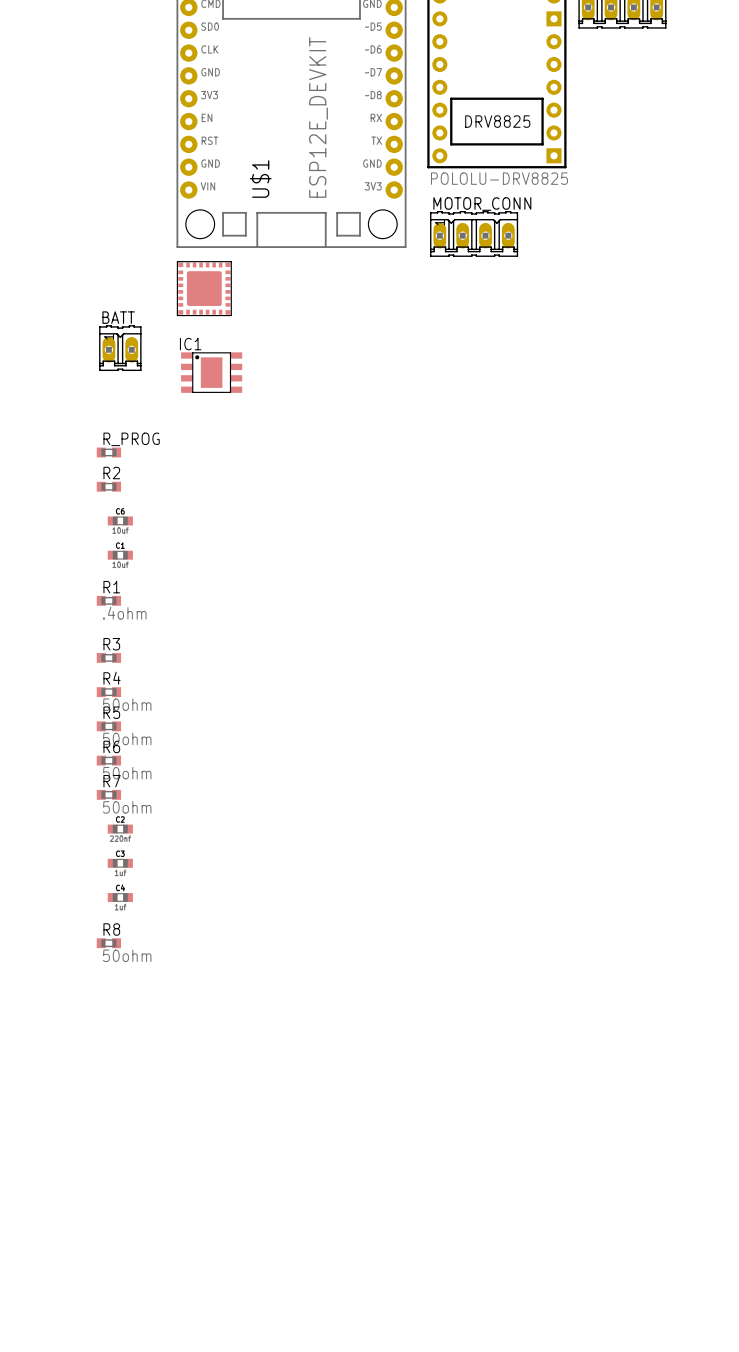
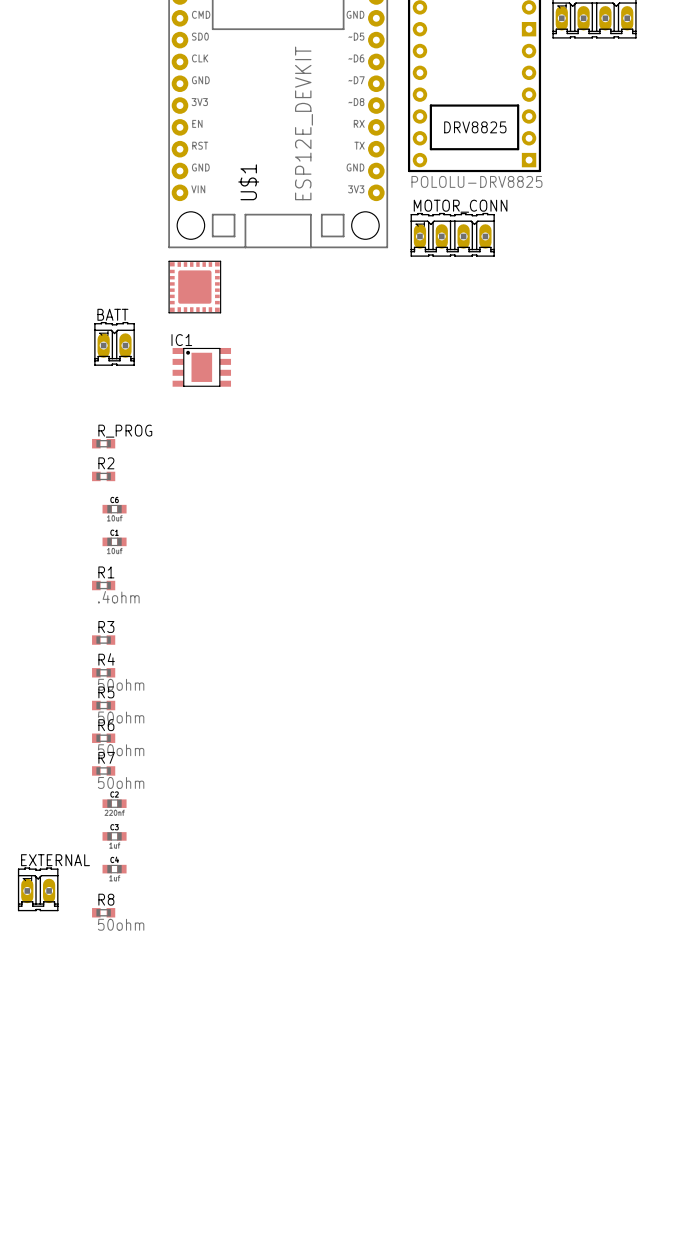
EXTERNAL: none -> (38, 889)

